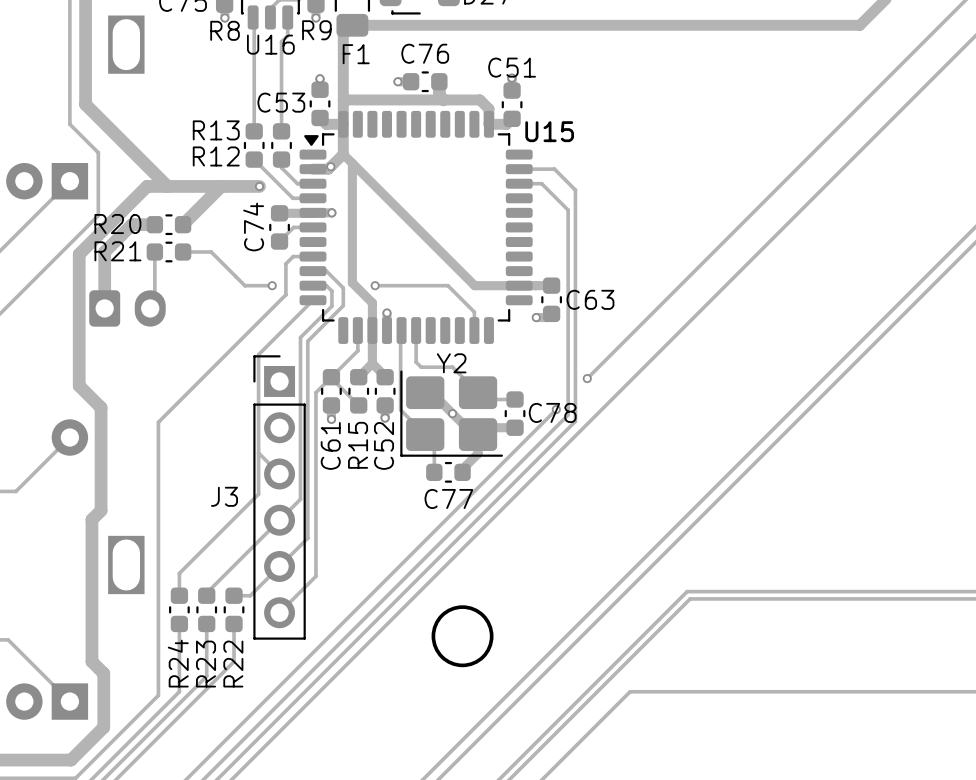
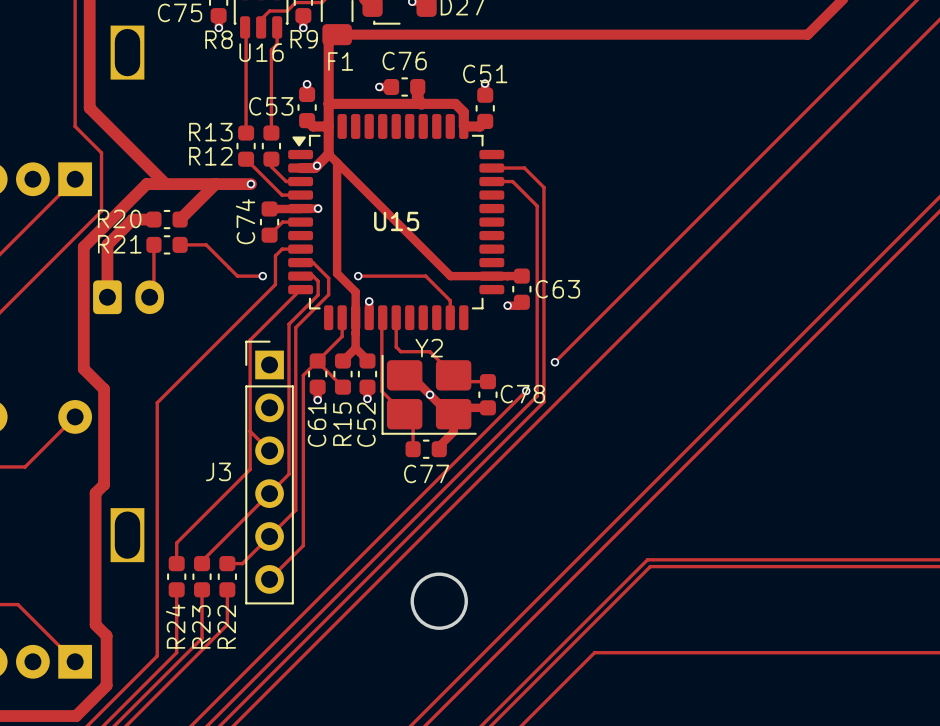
U15 name position: U15 (549, 131) -> U15 (396, 221)

